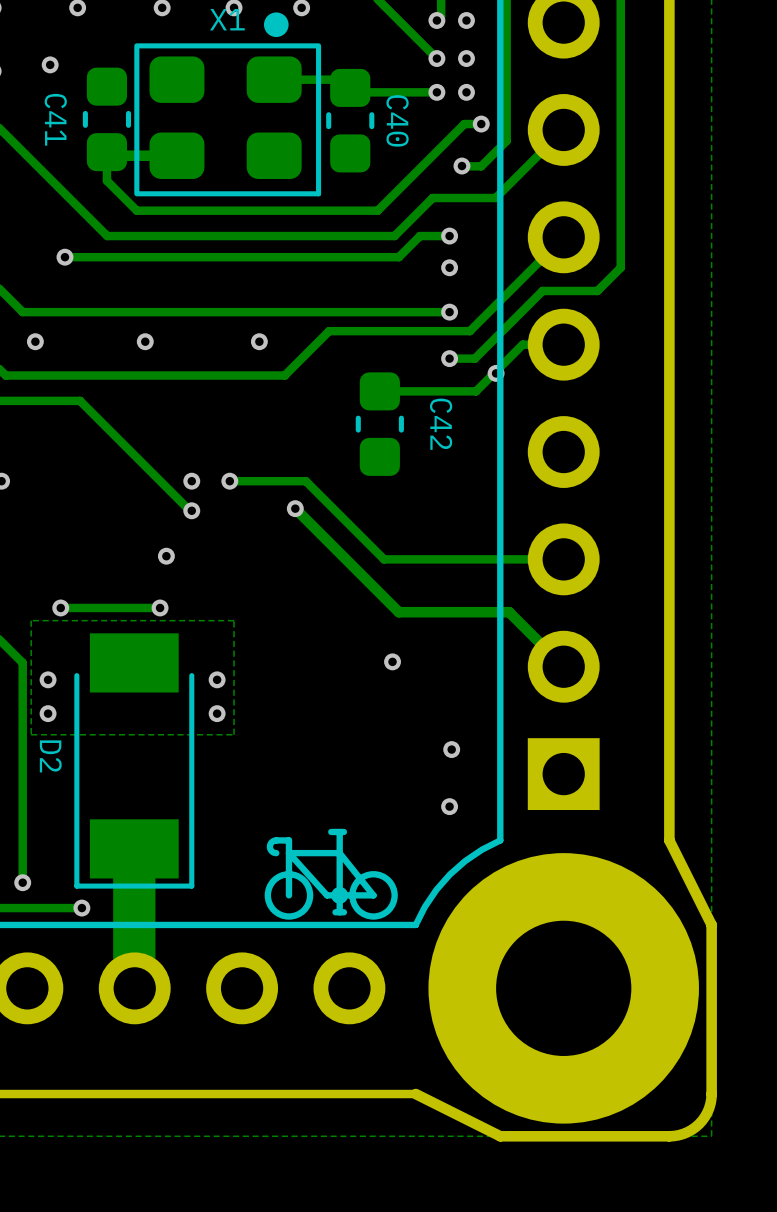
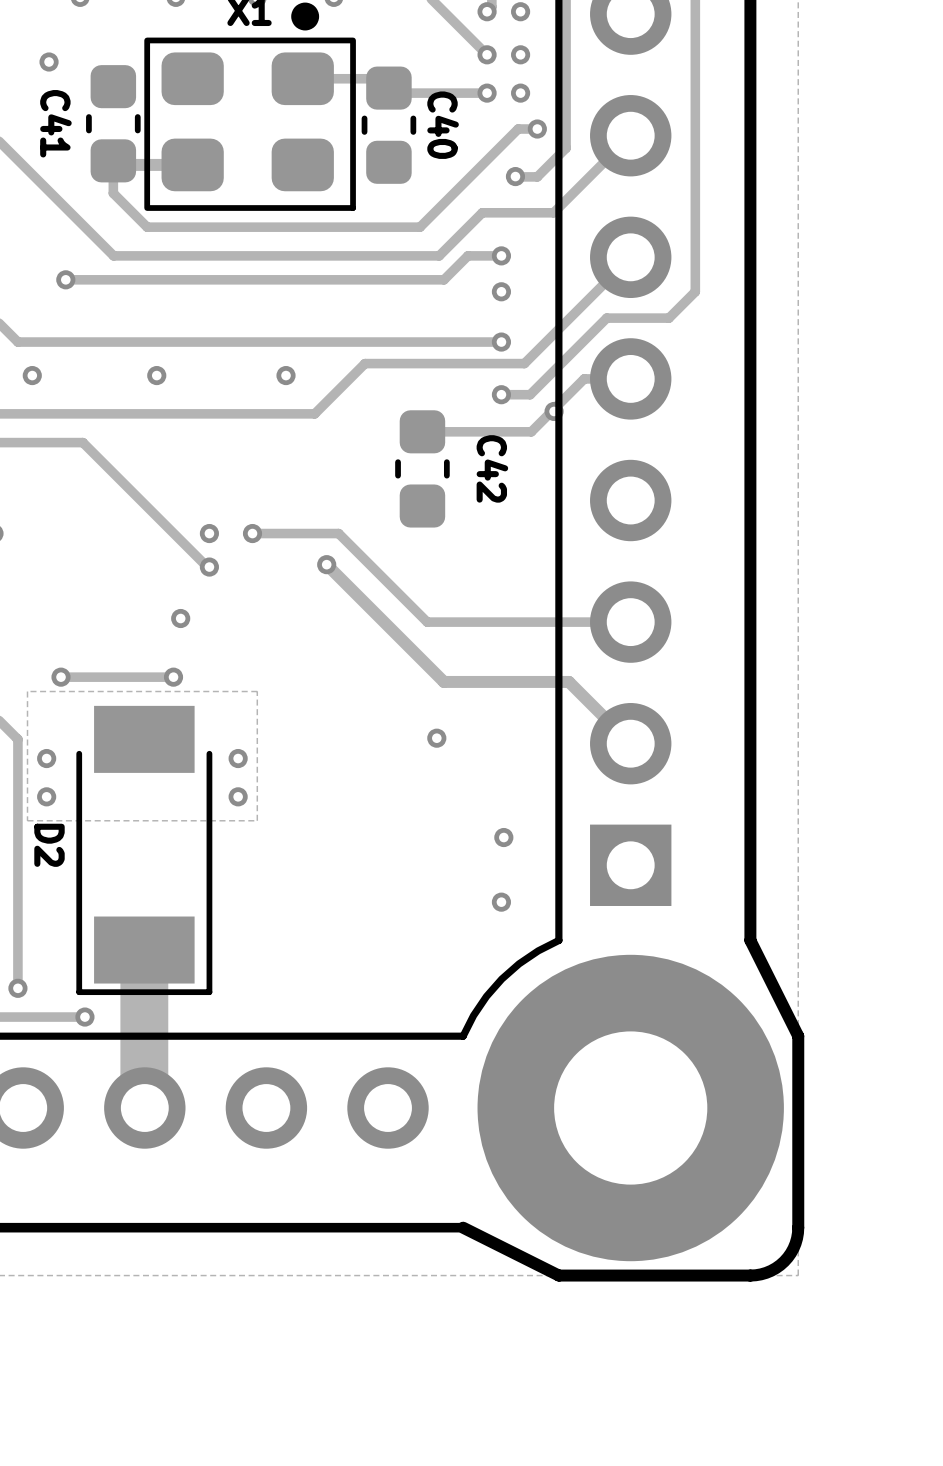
drawing: [264, 828, 398, 920] -> none

